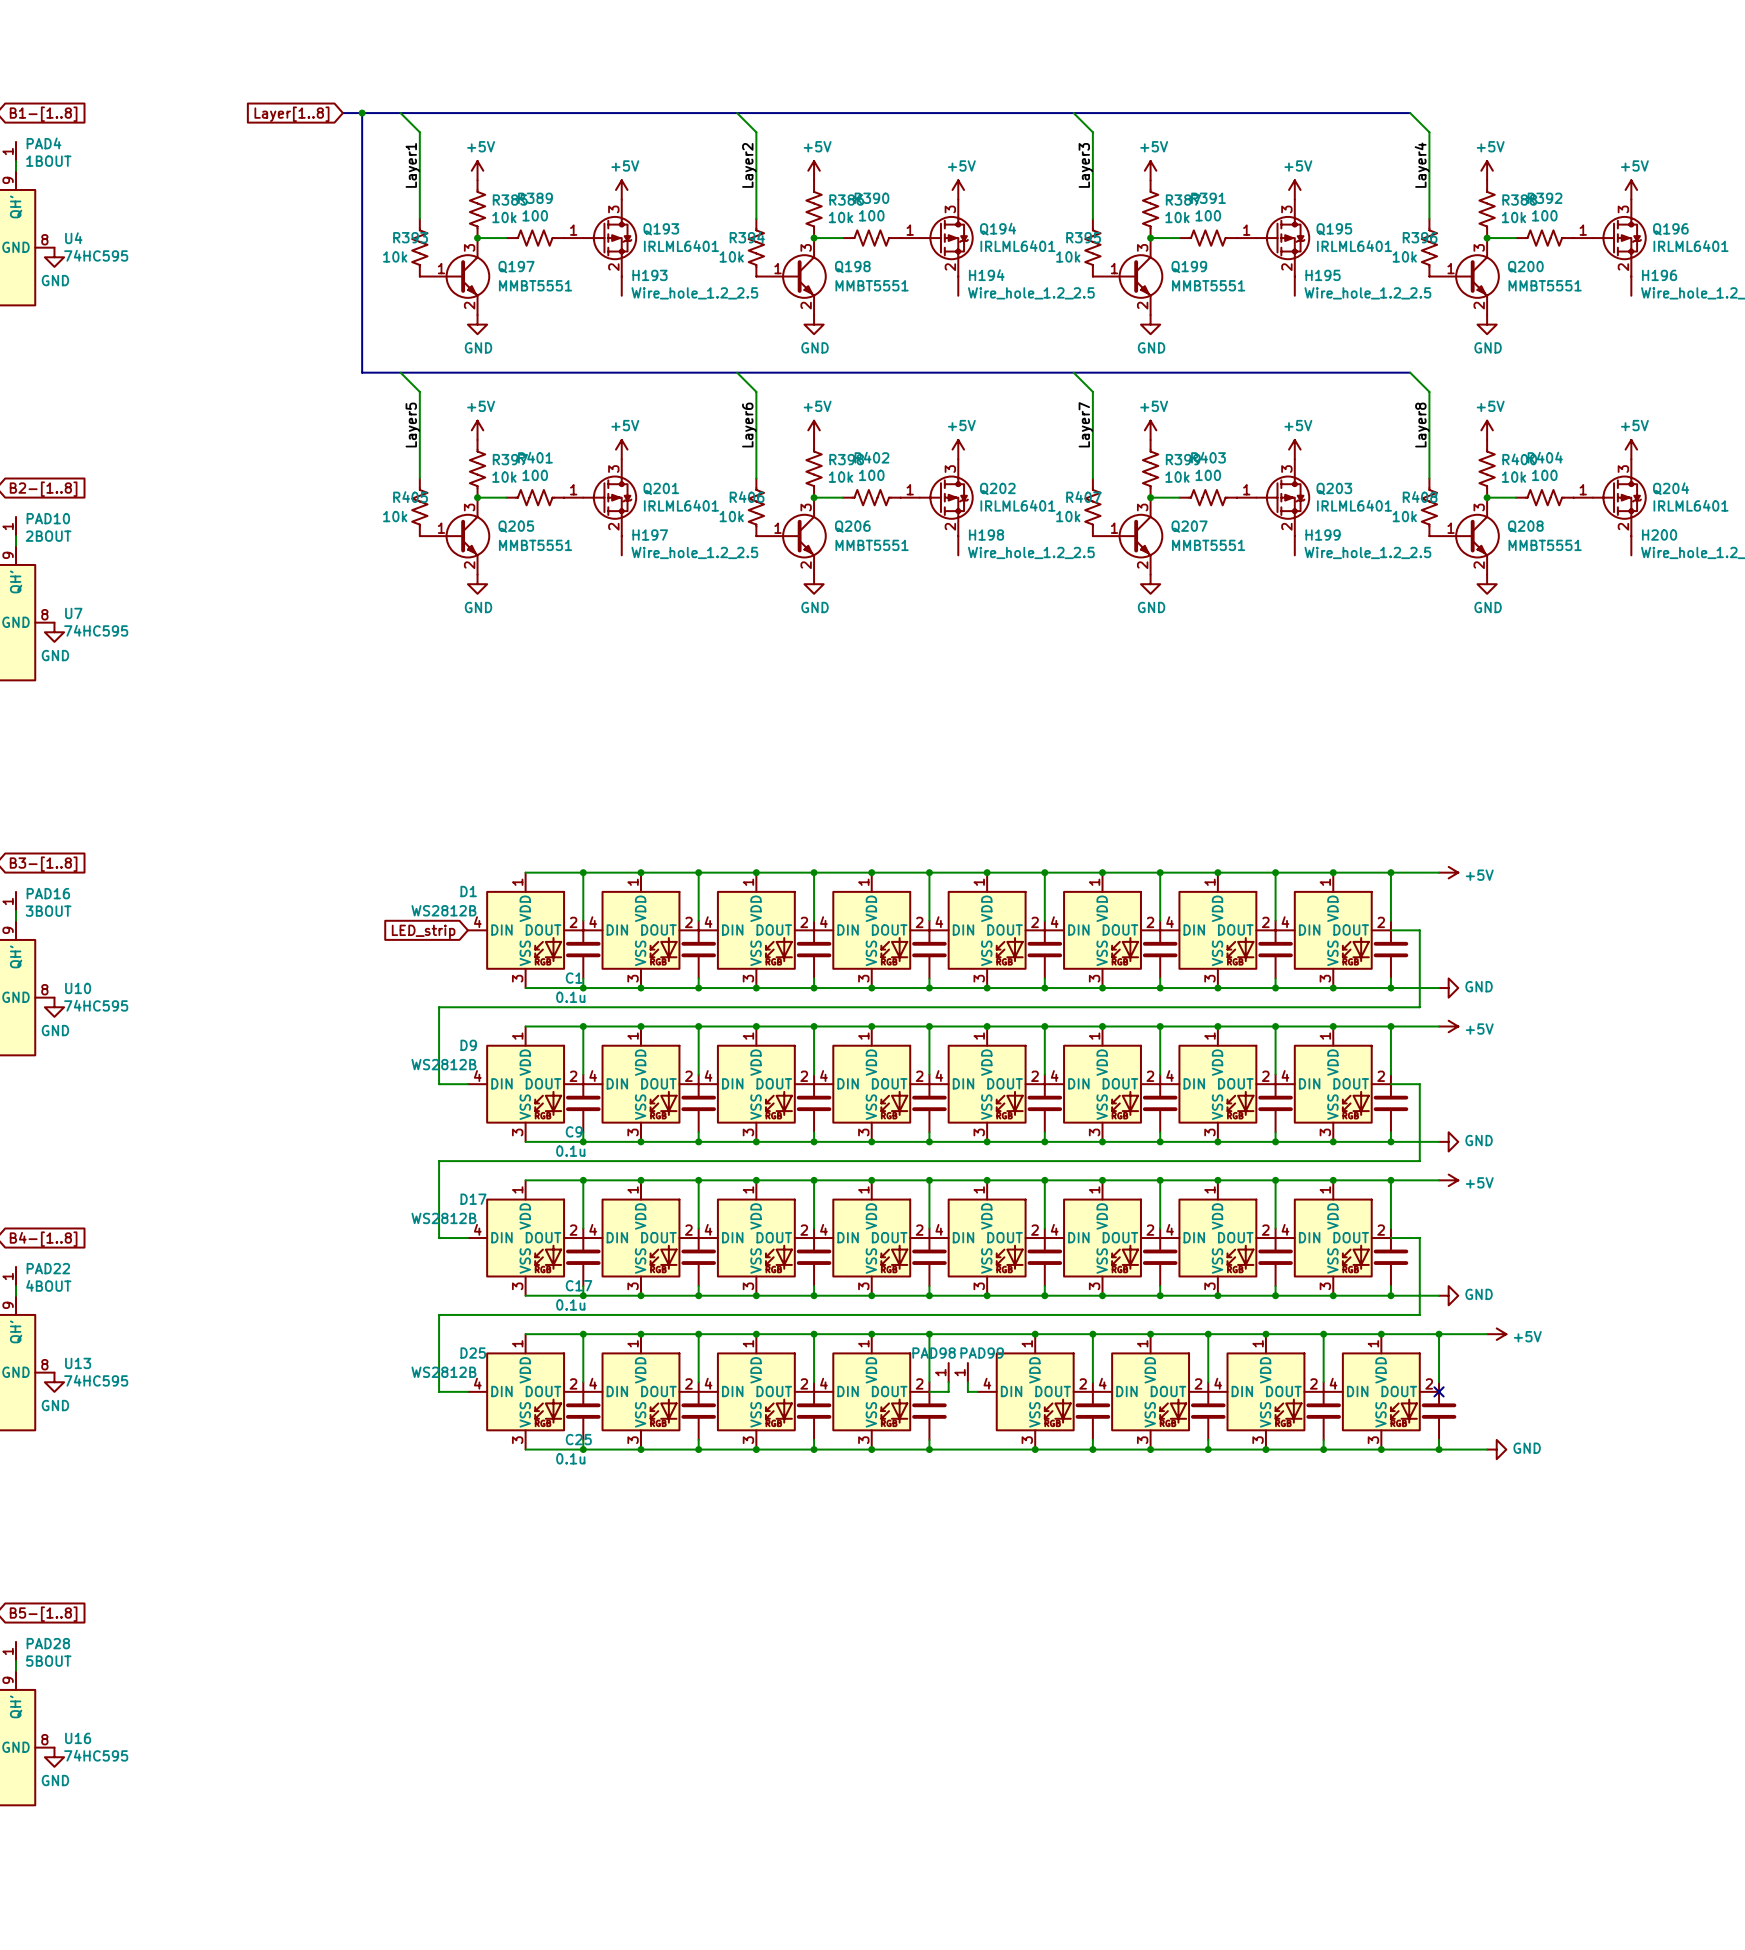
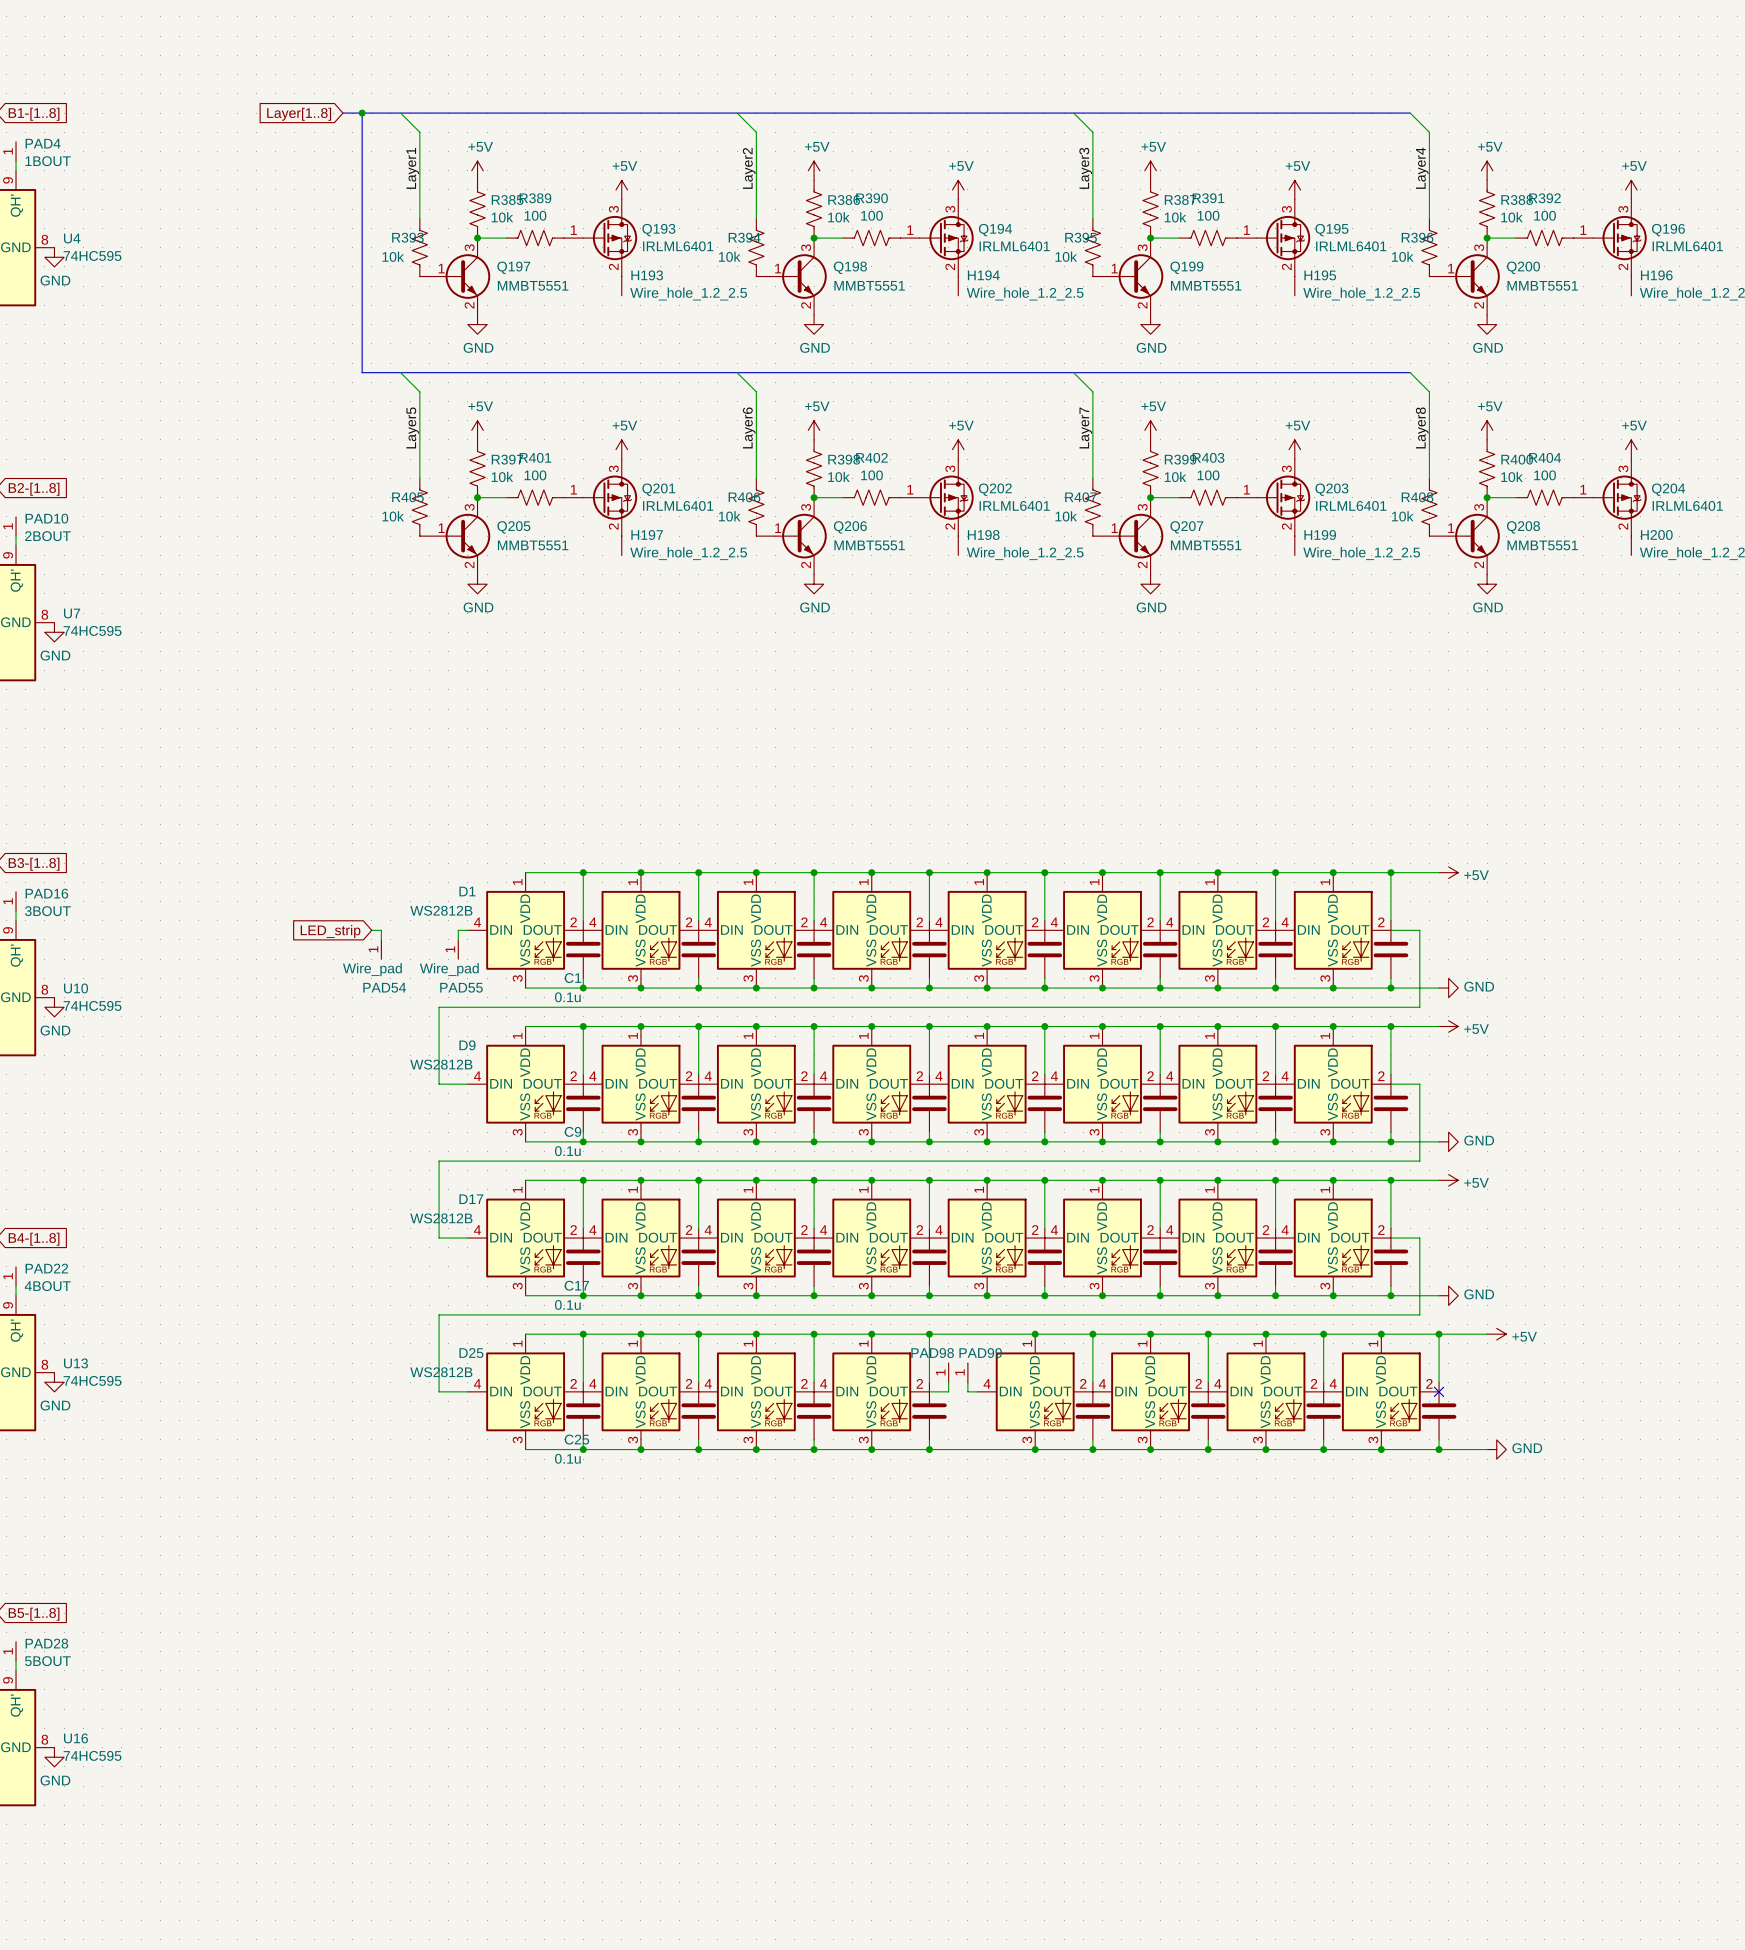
wire: none -> (371, 930) (381, 930) (381, 939)
wire: none -> (467, 930) (458, 930) (458, 939)
global label position: LED_strip (423, 931) -> LED_strip (330, 931)
PAD54: none -> Wire_pad (381, 949)
PAD55: none -> Wire_pad (458, 949)

